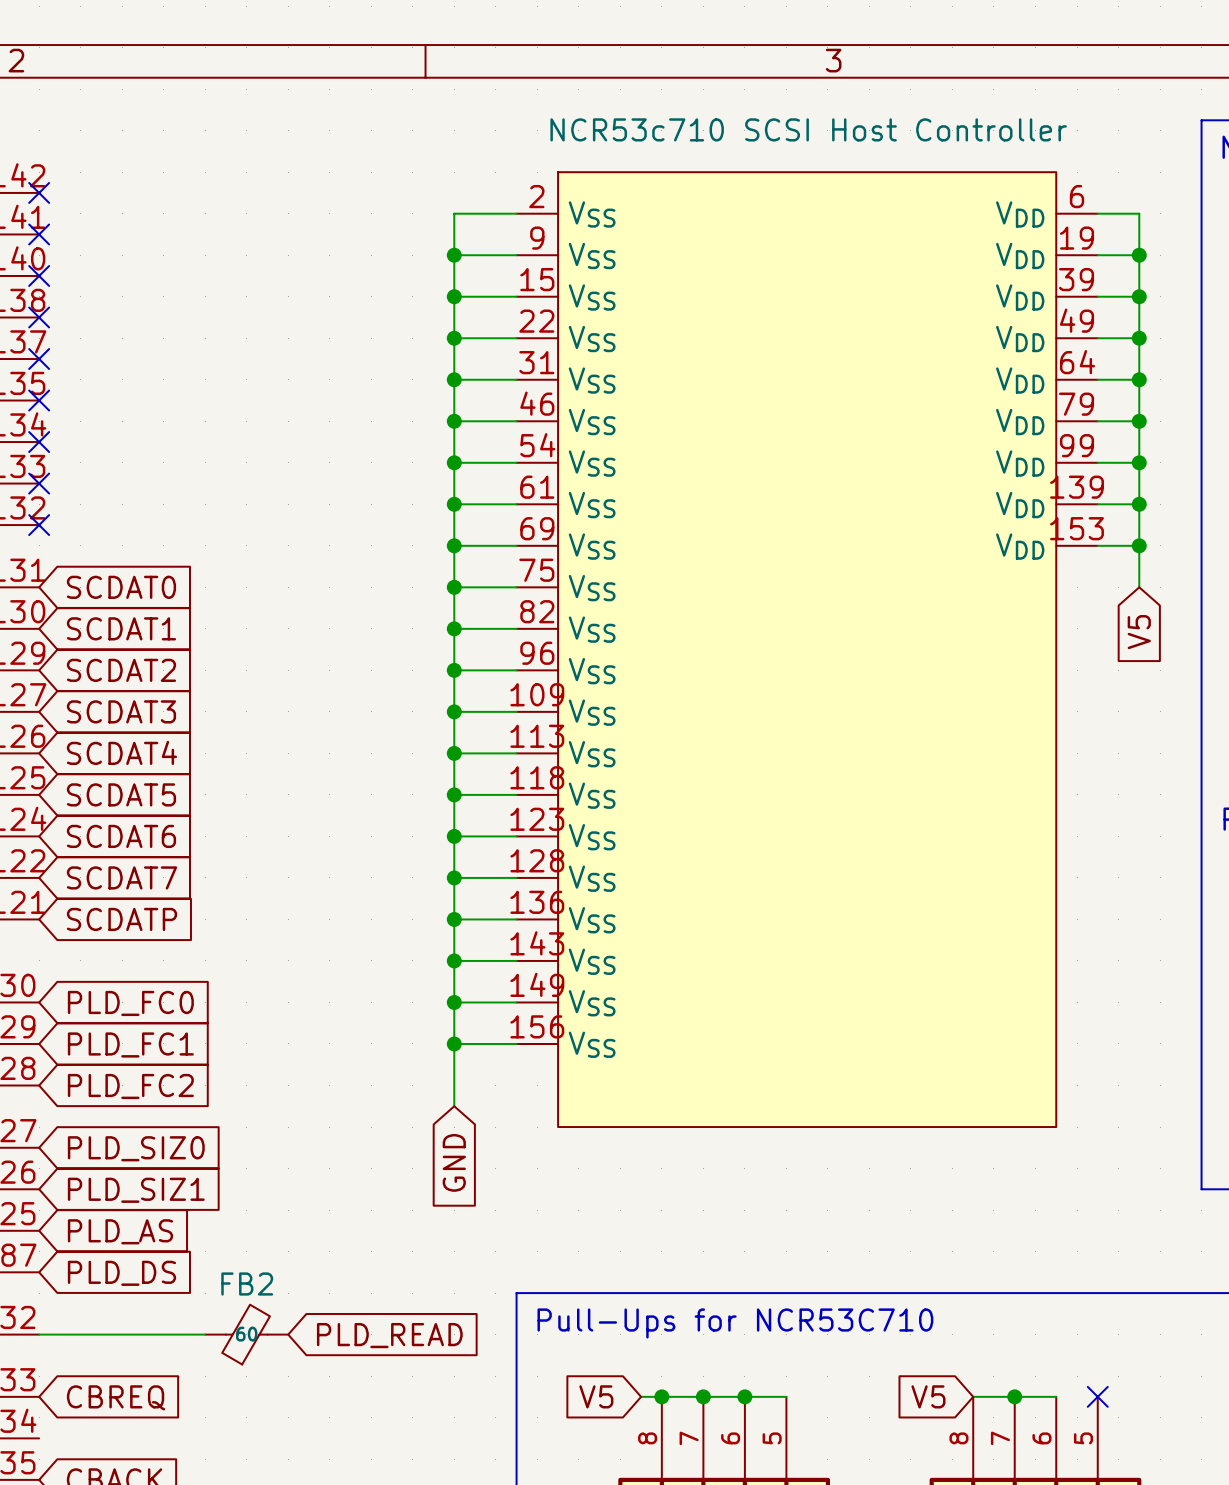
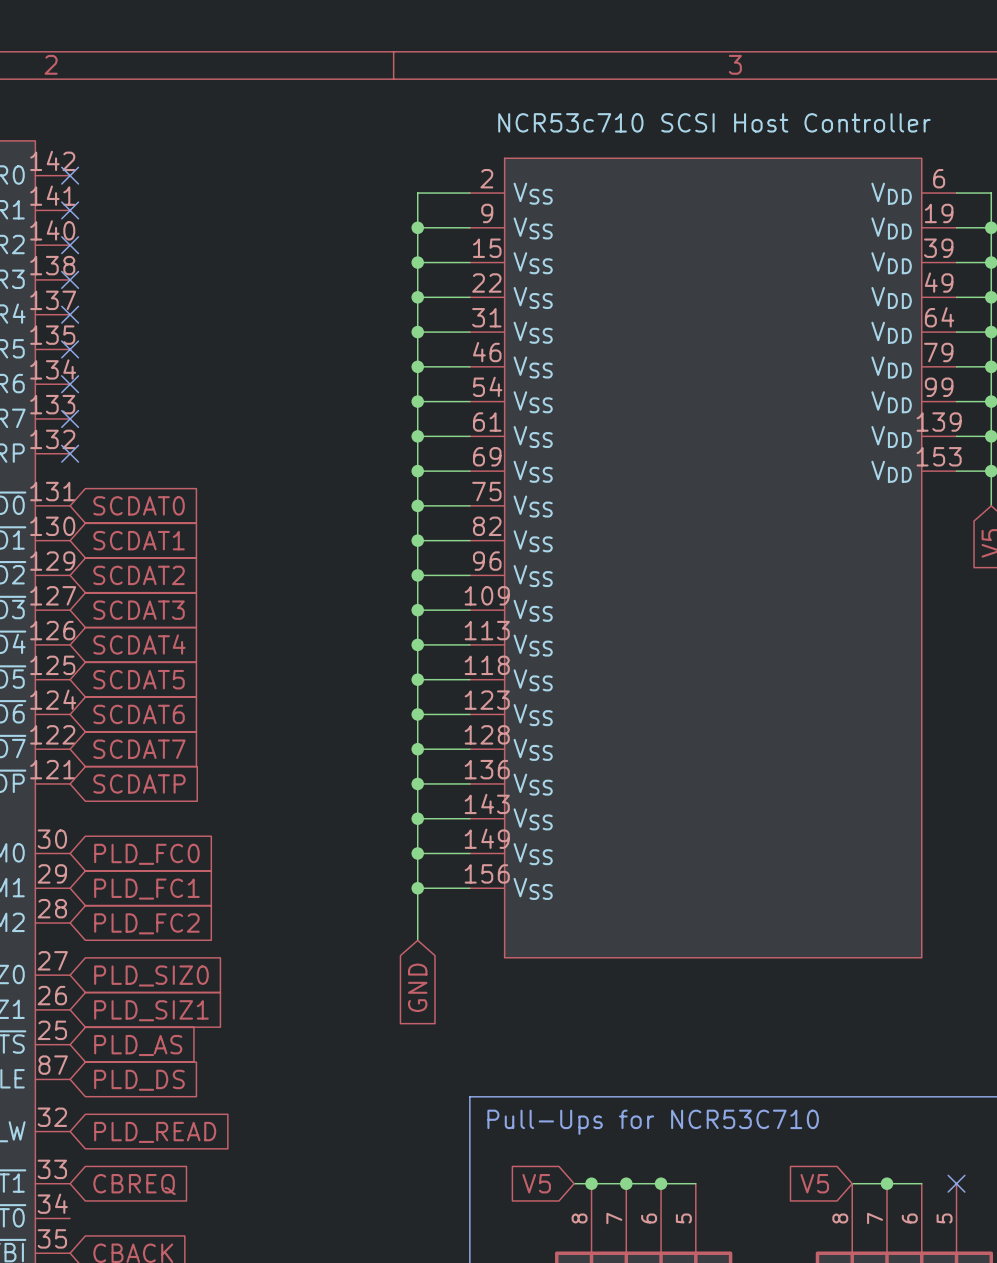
wire: (39, 1334) (205, 1334) -> none
FB2: 60 (246, 1334) -> none
global label position: PLD_READ (389, 1335) -> PLD_READ (155, 1132)

